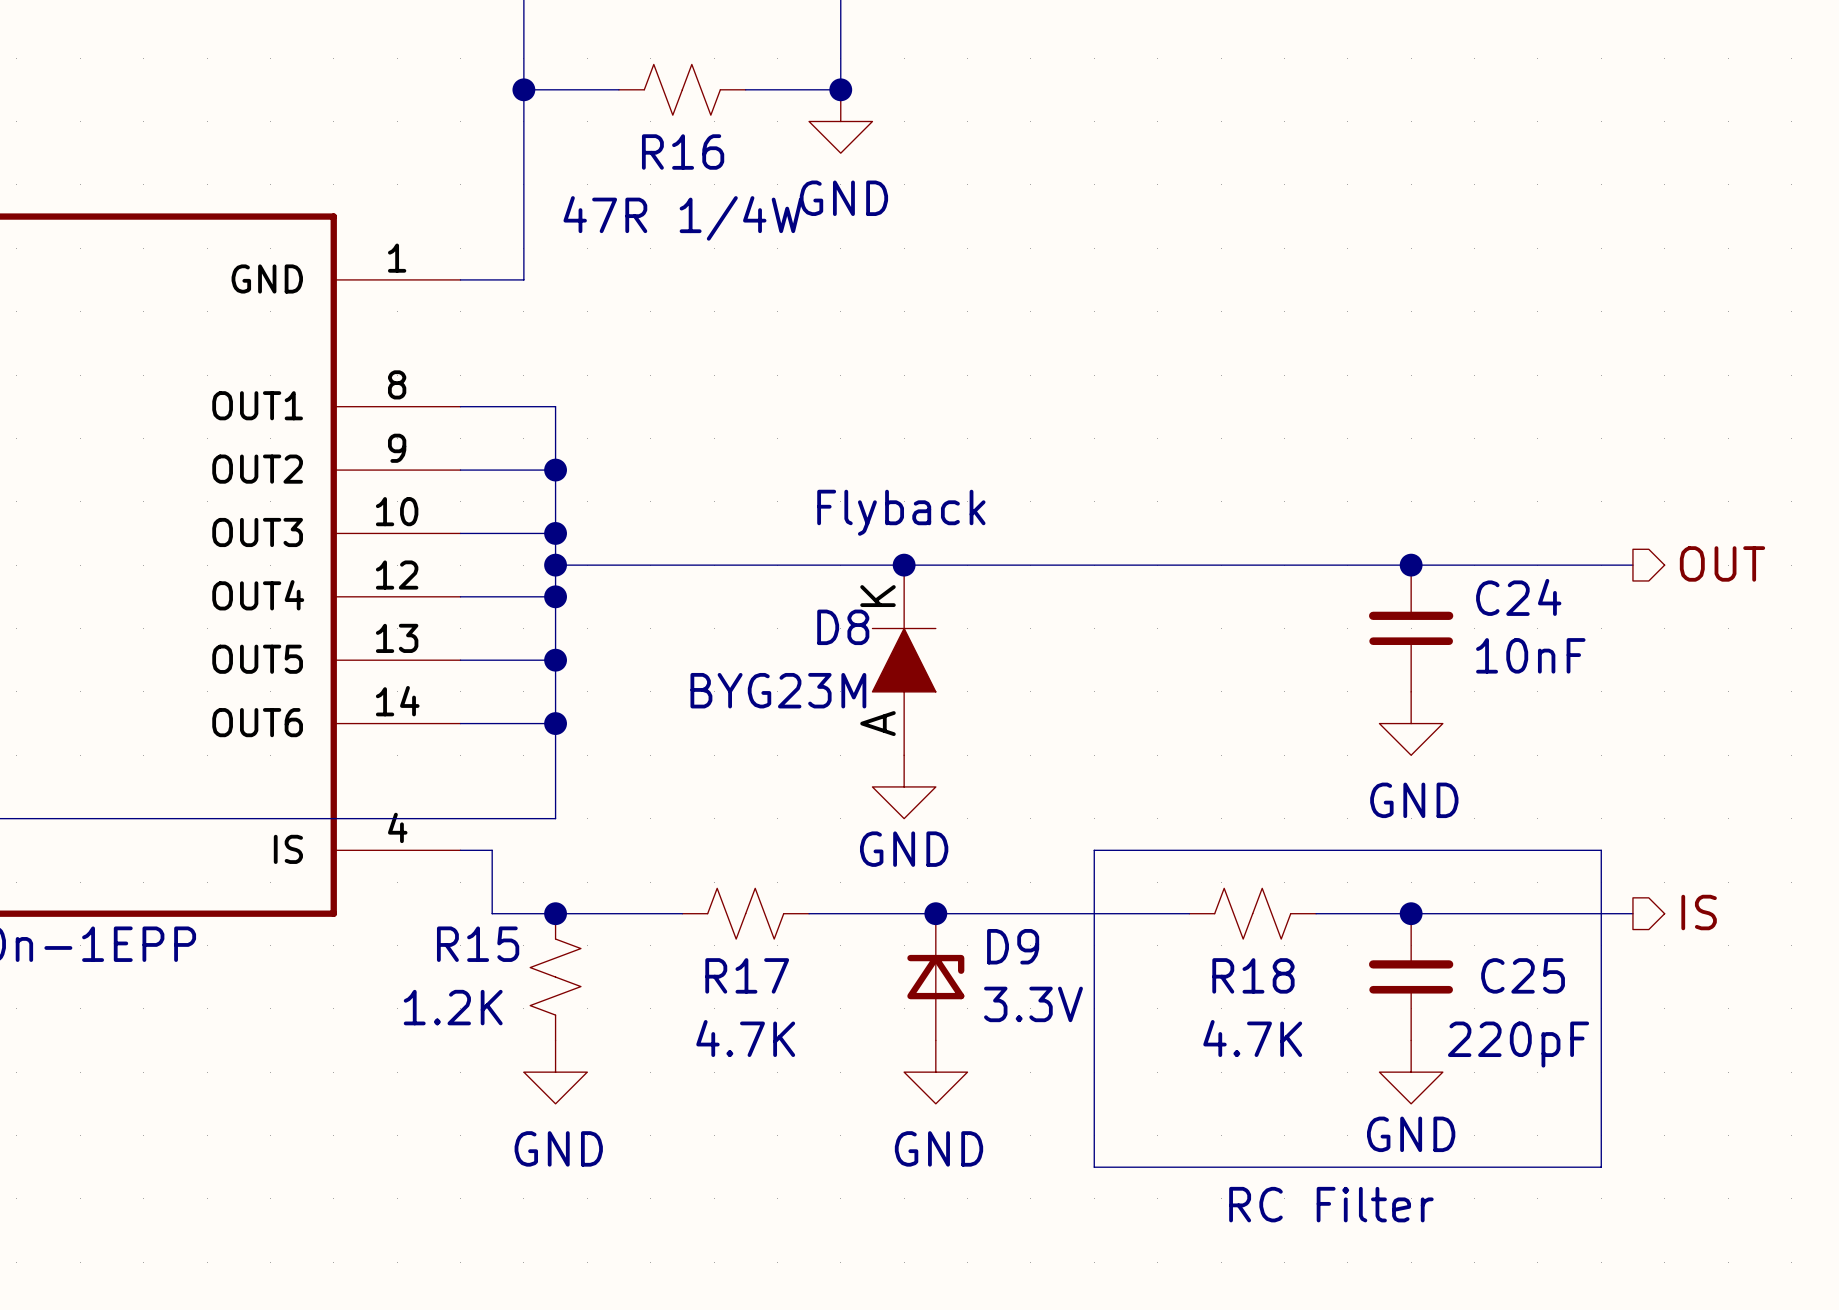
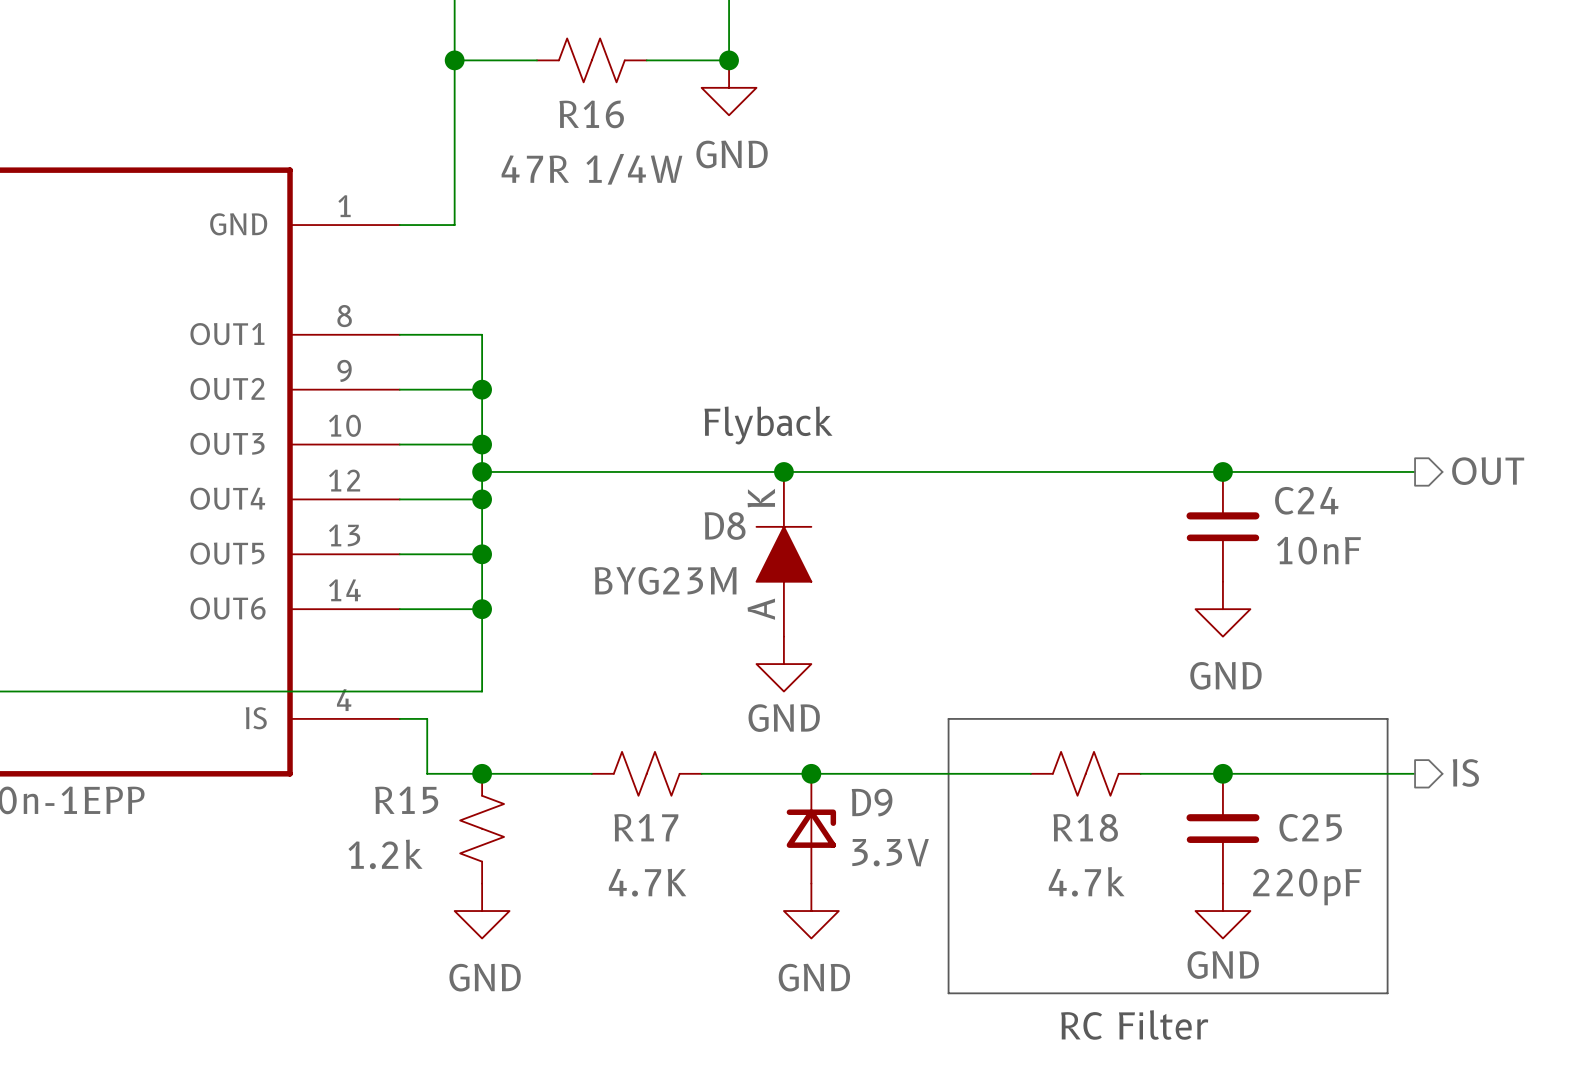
R15 value: 1.2K (453, 1007) -> 1.2k (385, 854)
R18 value: 4.7K (1252, 1038) -> 4.7k (1086, 881)

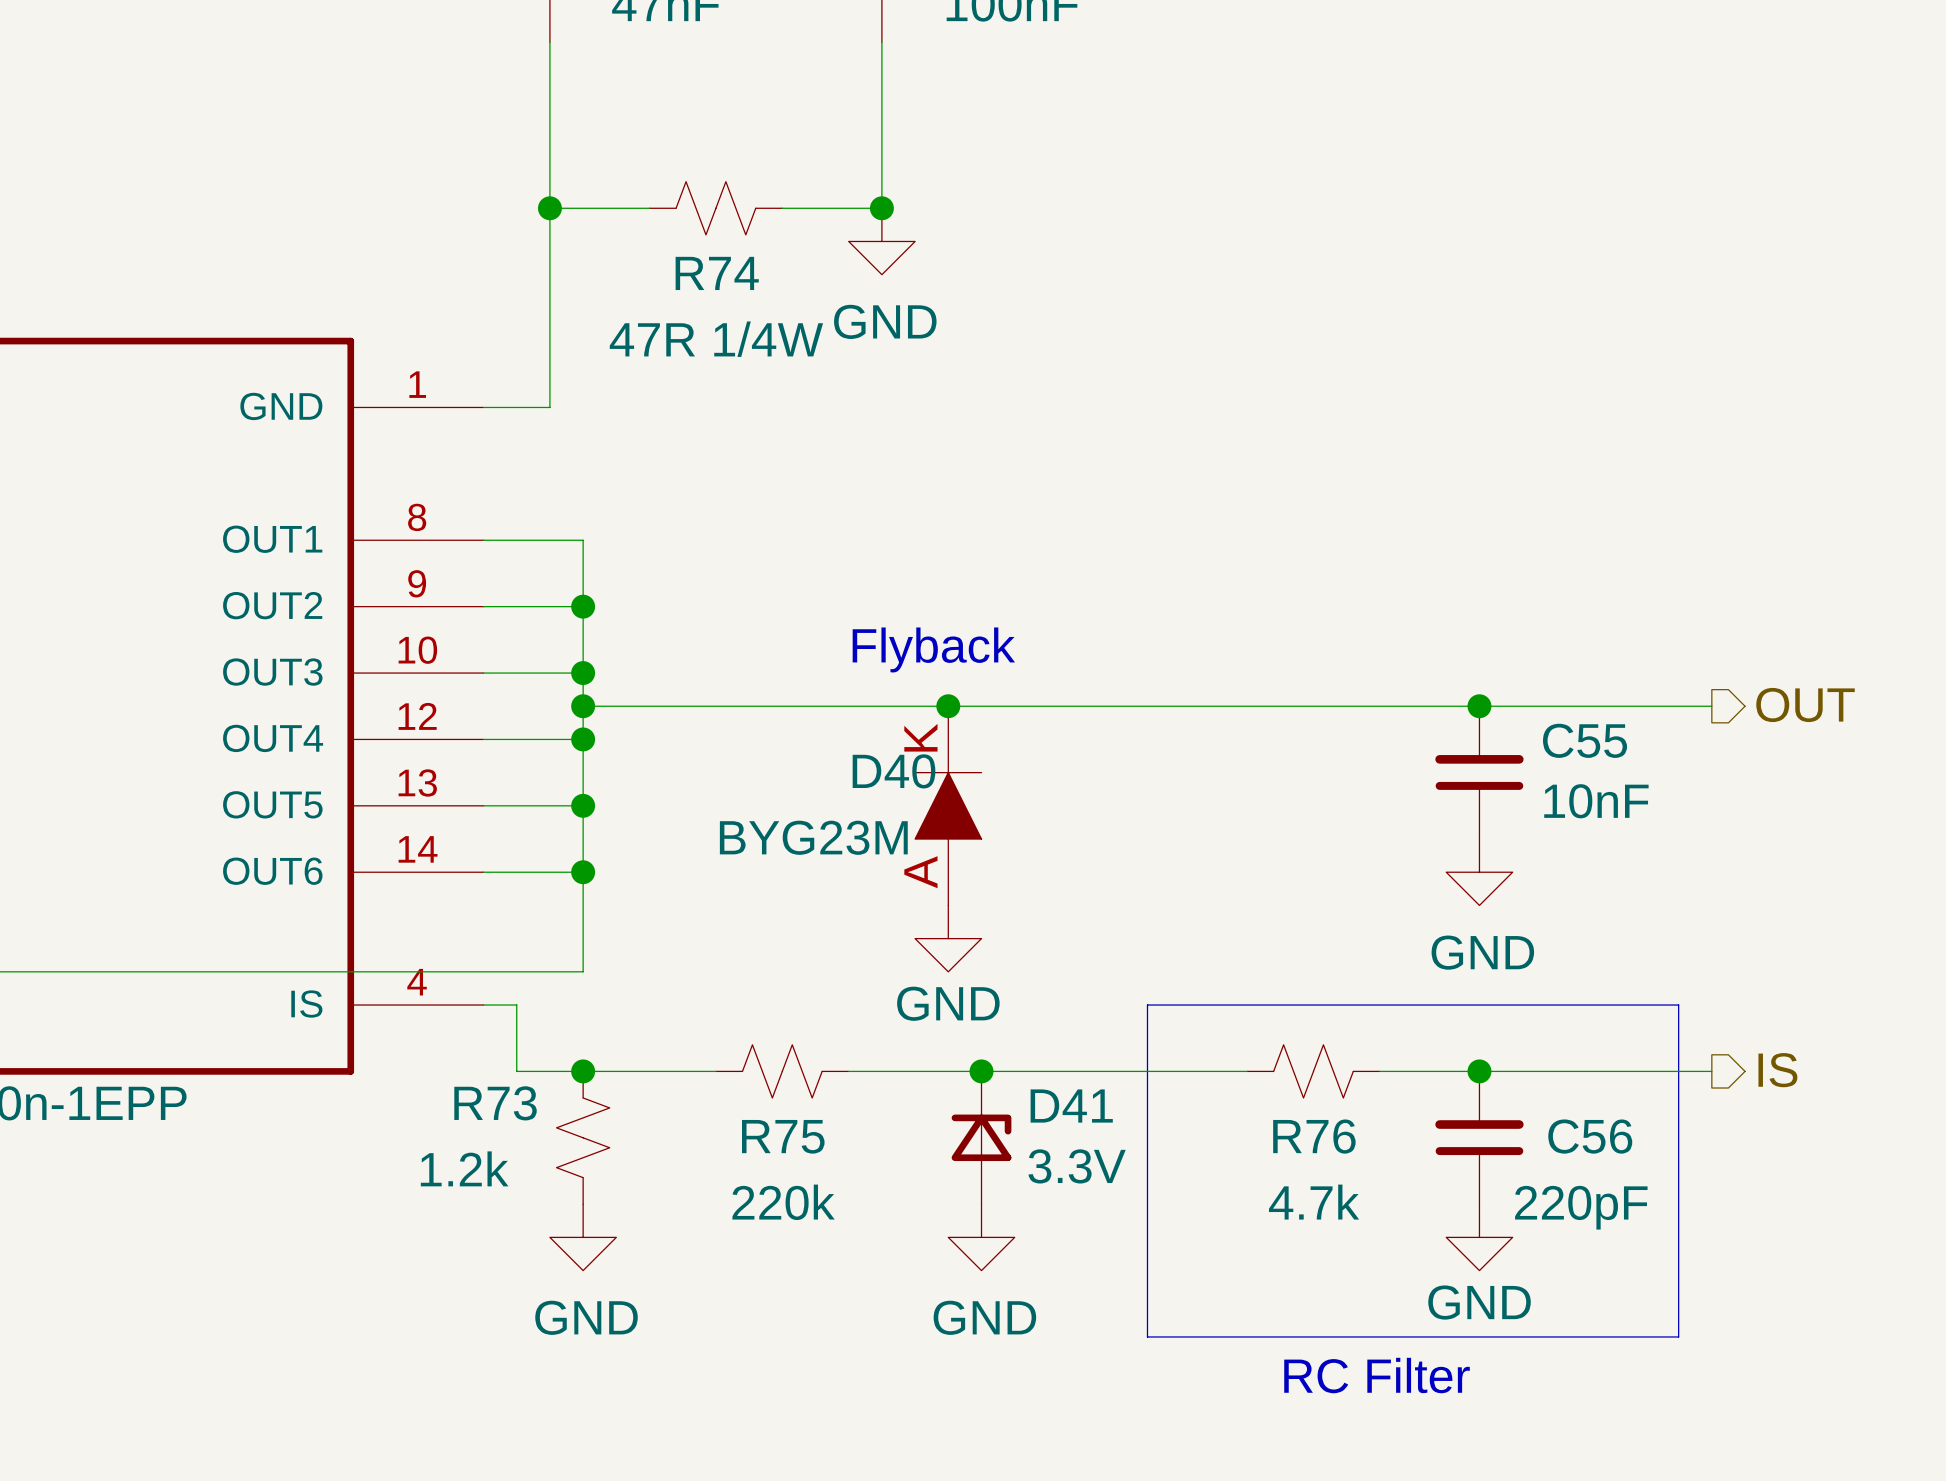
R16 name: R16 (591, 114) -> R74 (717, 273)
C24 name: C24 (1306, 500) -> C55 (1585, 740)
D8 name: D8 (725, 526) -> D40 (894, 771)
R15 name: R15 (406, 800) -> R73 (495, 1103)
D9 name: D9 (872, 802) -> D41 (1071, 1106)
R17 name: R17 (646, 827) -> R75 (783, 1136)
R18 name: R18 (1085, 827) -> R76 (1314, 1136)
C25 name: C25 (1310, 827) -> C56 (1590, 1136)
R17 value: 4.7K (647, 882) -> 220k (783, 1202)

